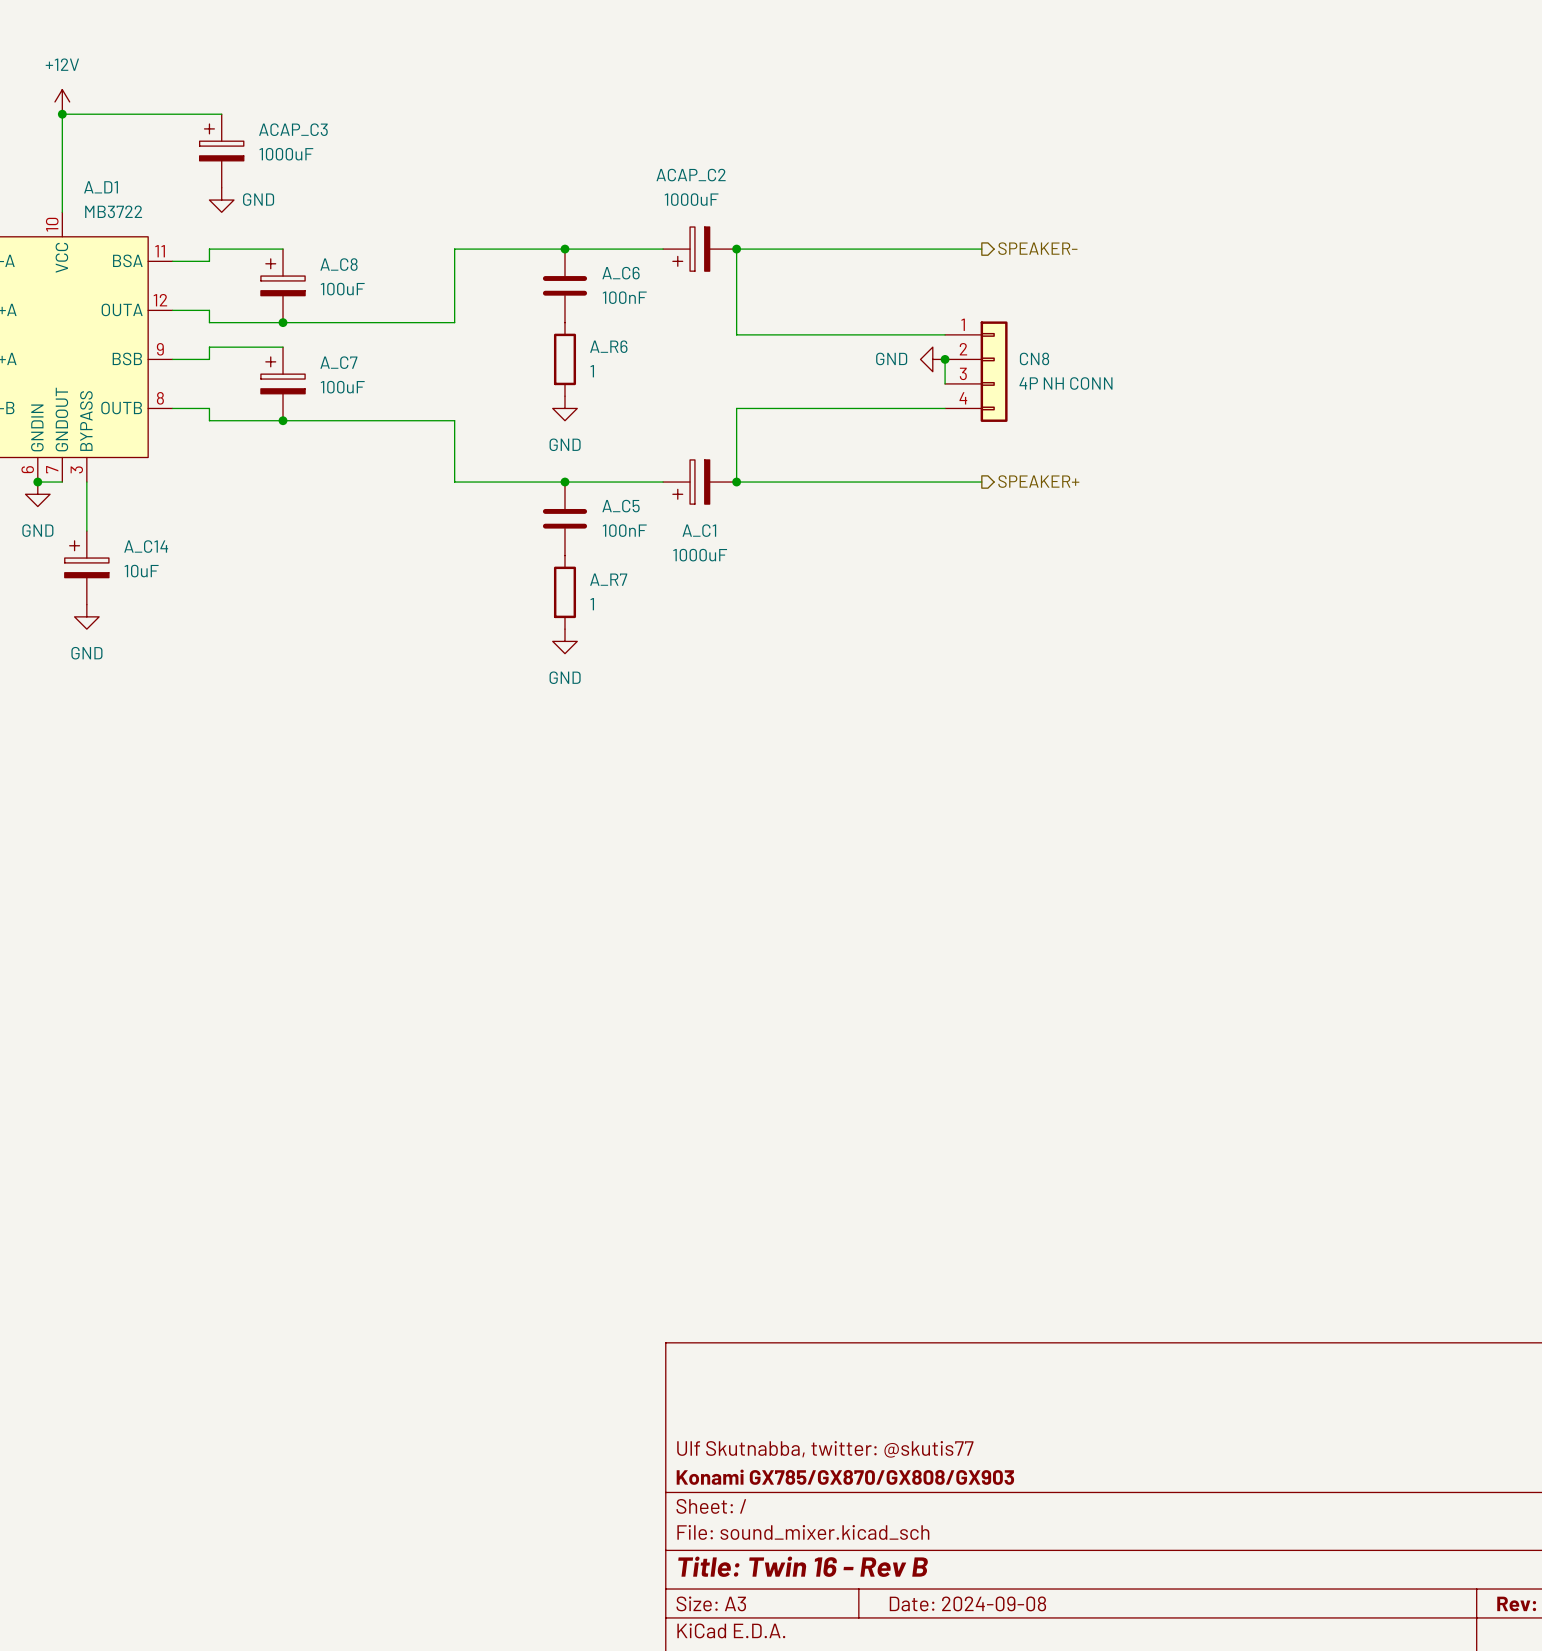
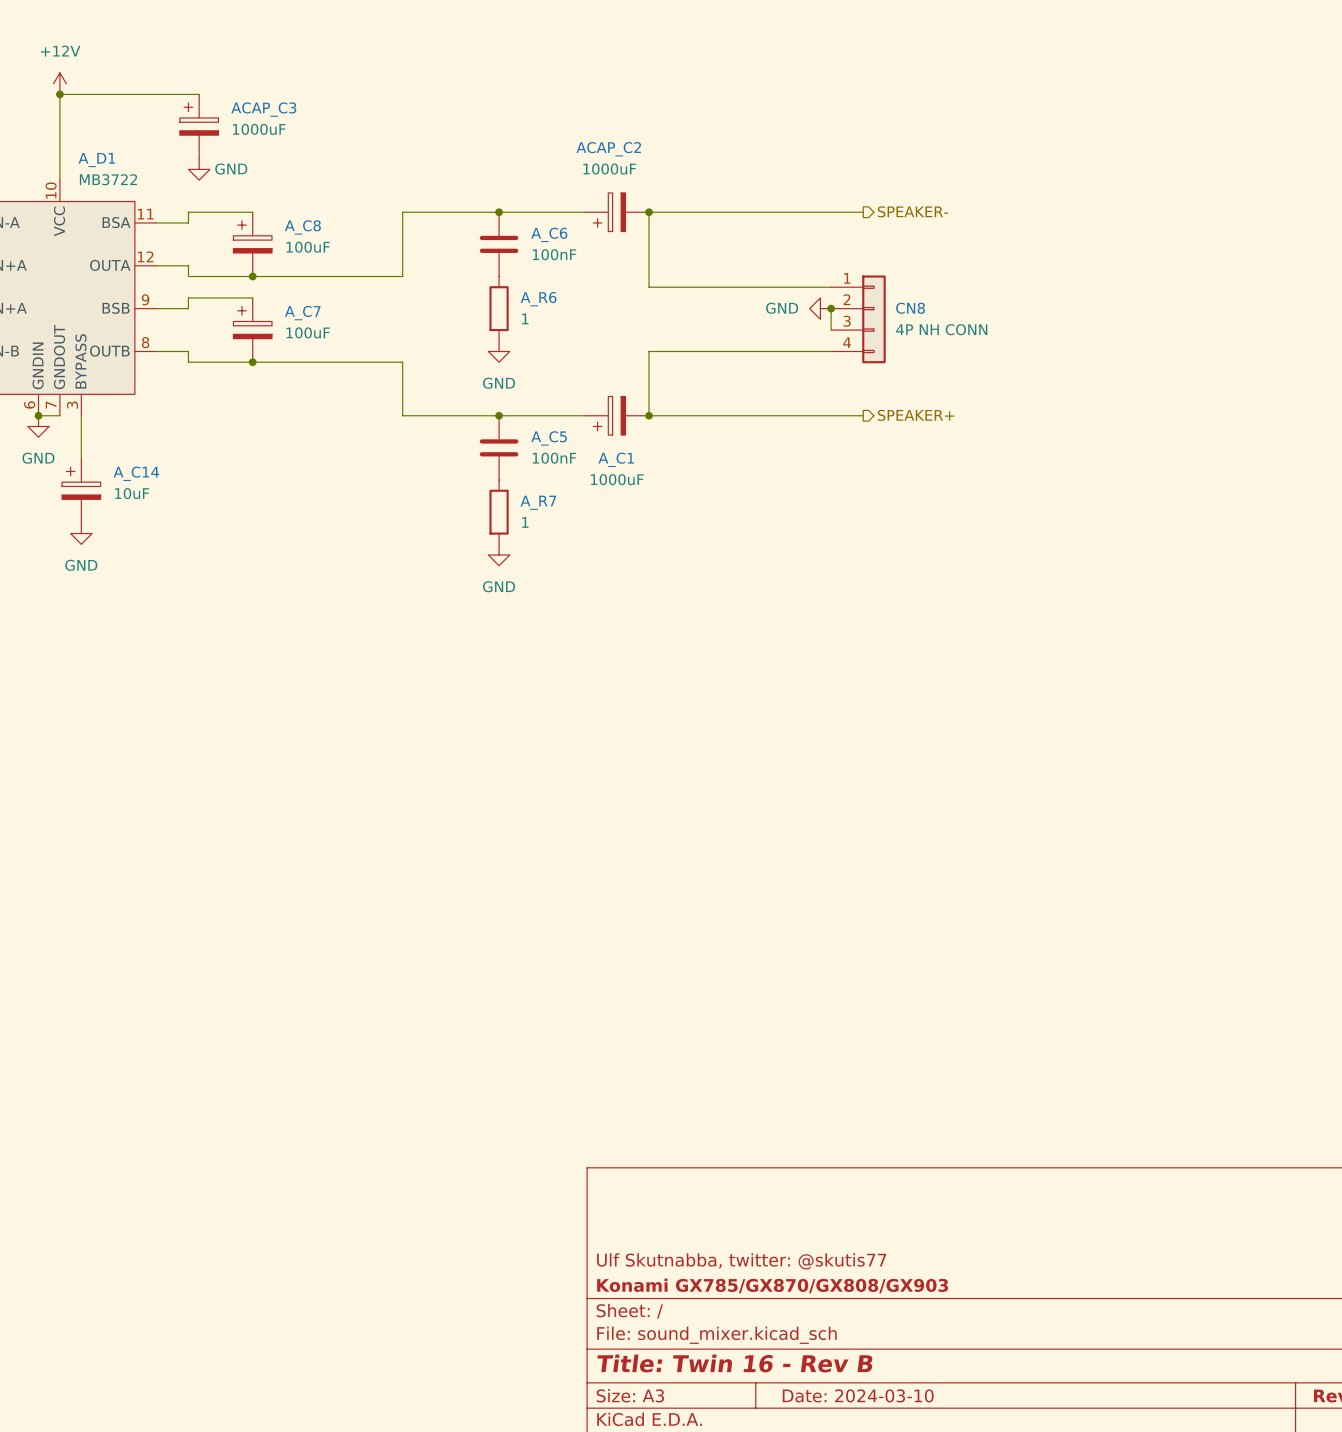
title block: Date: 2024-09-08 (967, 1603) -> Date: 2024-03-10 (858, 1395)

